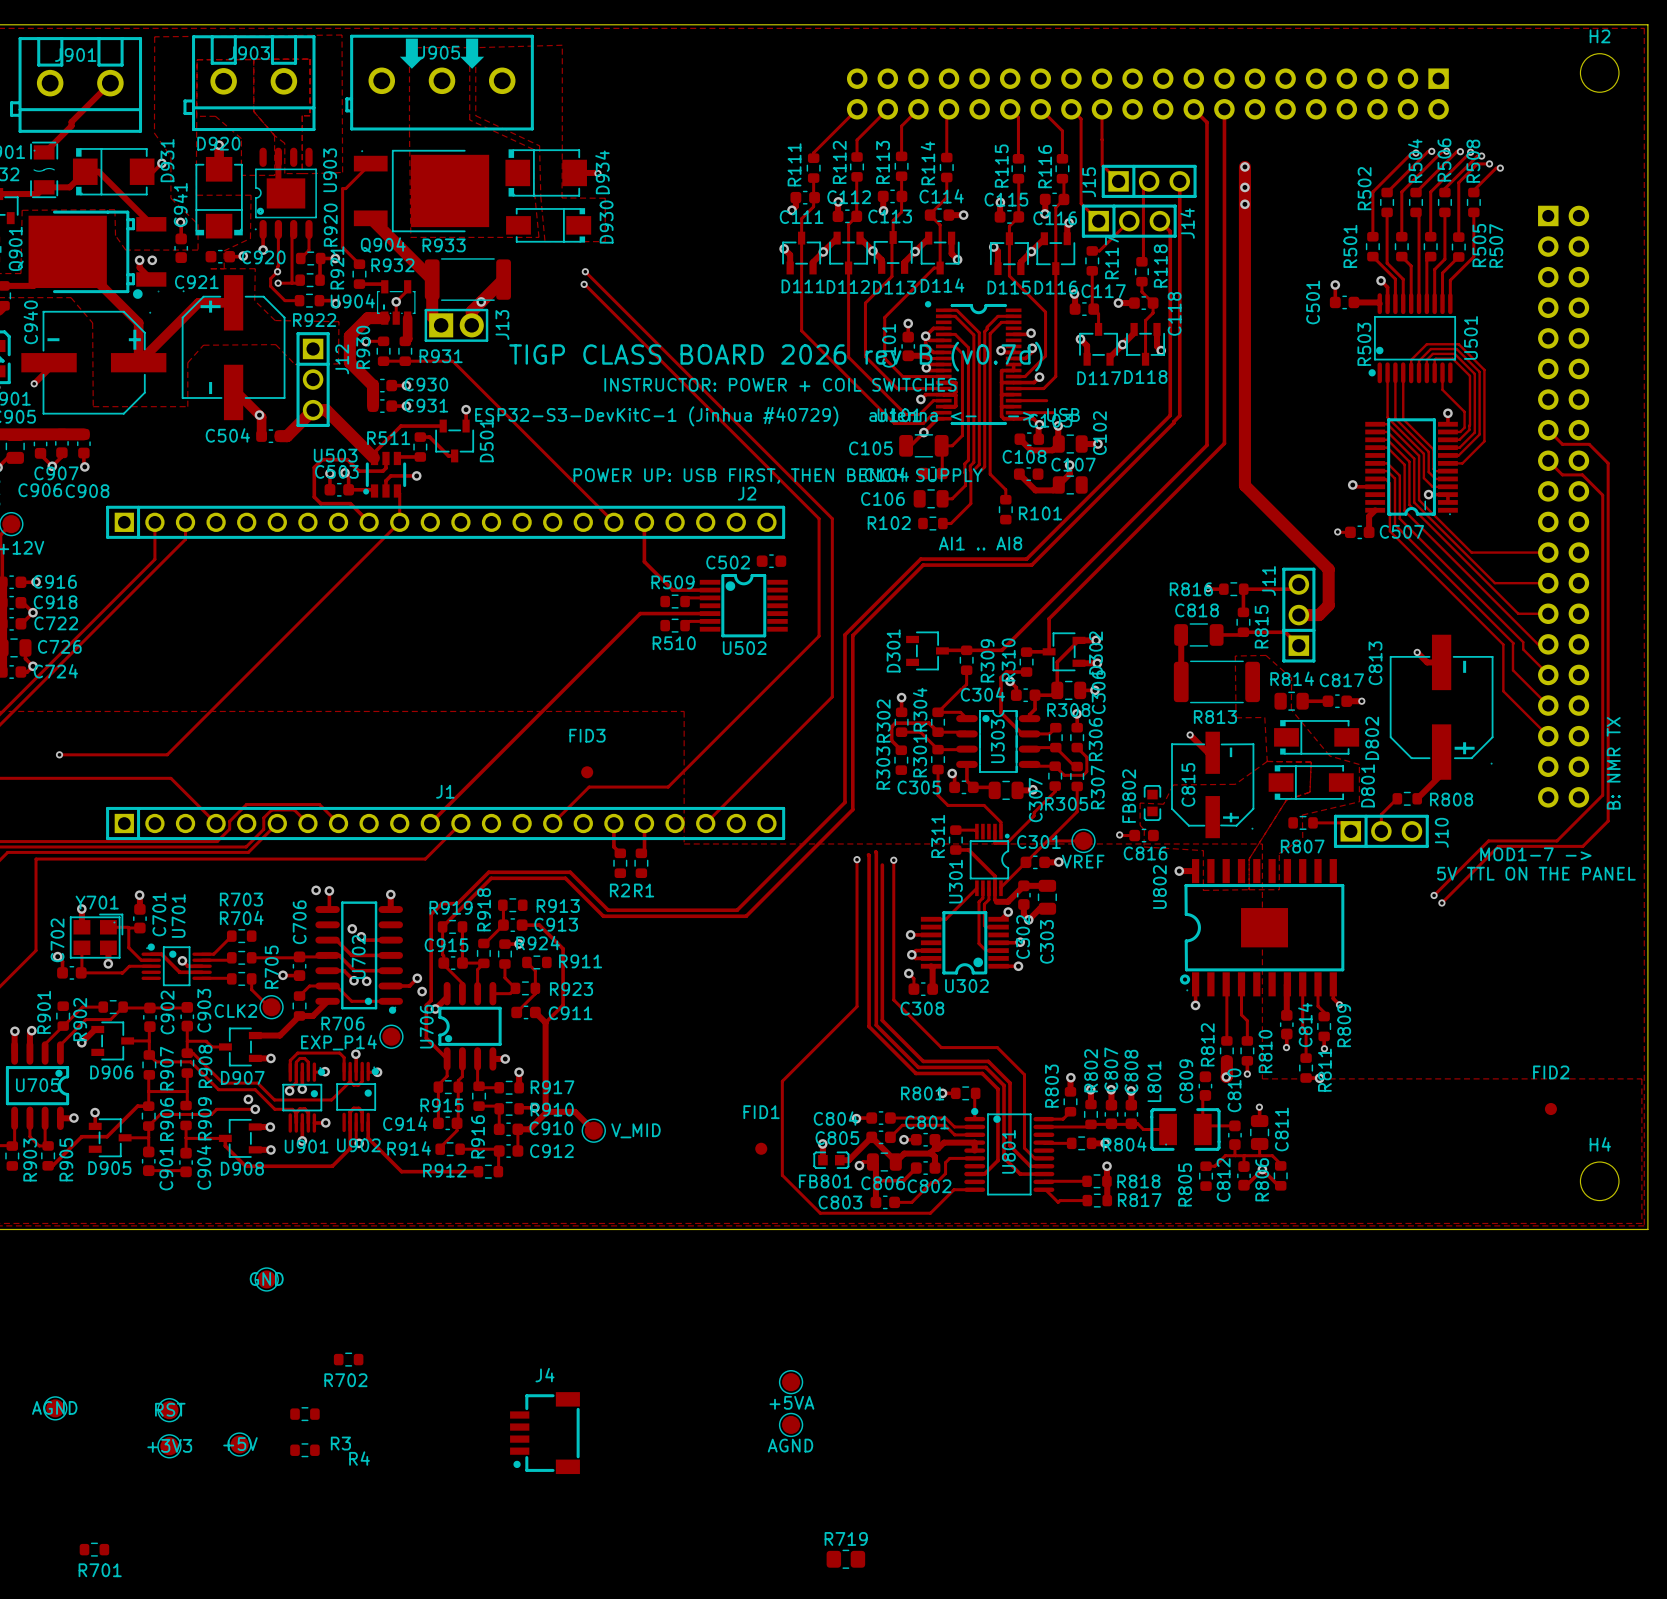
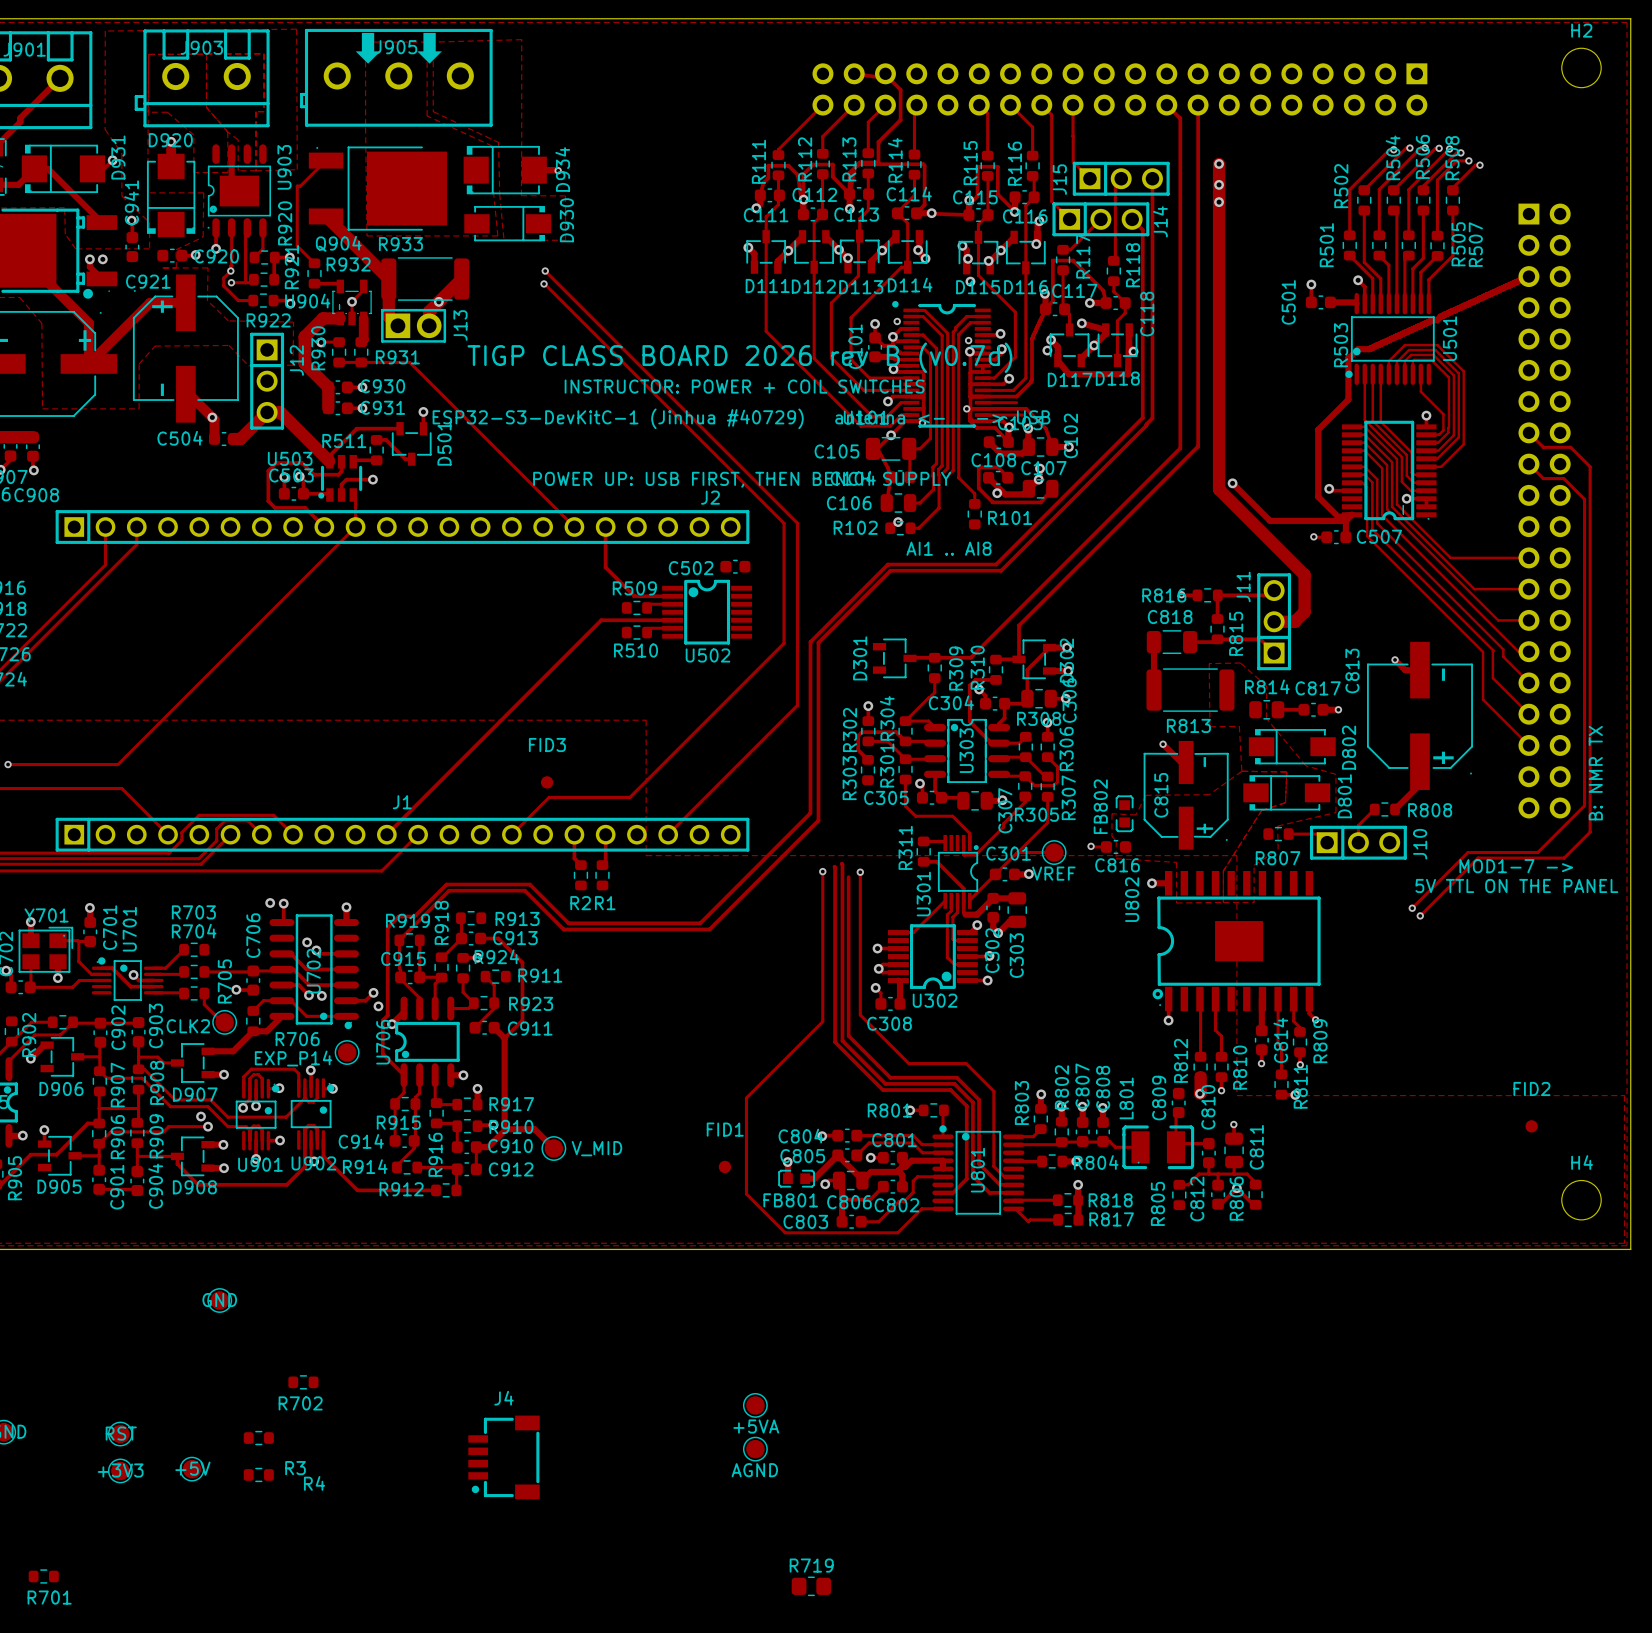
track: none -> (854, 73) (889, 78) (900, 89) (900, 119) (878, 142) (878, 162) (860, 162) (849, 172) (849, 208)
track: none -> (858, 164) (923, 164) (924, 204) (916, 213) (968, 215) (971, 202) (977, 196) (977, 166) (997, 166) (997, 194) (1015, 211)
track: none -> (855, 167) (849, 194) (832, 176) (832, 164) (813, 164) (803, 174) (803, 199)
track: none -> (760, 195) (763, 183) (768, 178) (768, 165) (788, 165) (797, 175) (803, 214)
via: none -> (1036, 244)
via: none -> (918, 250)
via: none -> (848, 258)
via: none -> (967, 258)
via: none -> (988, 260)
track: none -> (1528, 276) (1445, 314) (1437, 320) (1432, 320) (1371, 348) (1358, 349) (1348, 357) (1348, 399) (1318, 429) (1318, 496) (1338, 517) (1352, 514)
via: none -> (970, 281)
track: none -> (1106, 303) (1103, 290) (1073, 260) (1052, 260) (1052, 301) (1045, 309) (1031, 338) (1031, 381) (1016, 396) (982, 396)
via: none -> (897, 321)
track: none -> (1081, 323) (1105, 329)
via: none -> (1081, 323)
track: none -> (1129, 329) (1127, 374) (1068, 374) (1057, 360)
track: none -> (875, 337) (883, 345) (892, 345)
via: none -> (968, 340)
via: none -> (1047, 350)
track: none -> (971, 353) (970, 372)
track: none -> (911, 371) (923, 371) (923, 384)
track: none -> (923, 408) (922, 423)
via: none -> (966, 408)
track: none -> (970, 408) (970, 421) (976, 427) (995, 427) (1008, 442)
track: none -> (982, 408) (1026, 408) (1045, 428) (1052, 447)
via: none -> (922, 423)
track: none -> (877, 448) (890, 477) (886, 503)
track: none -> (1007, 477) (998, 467) (978, 467) (978, 488) (992, 502) (1040, 502) (1052, 488)
via: none -> (1038, 479)
track: none -> (1232, 483) (1270, 520) (1345, 520)
via: none -> (1232, 483)
via: none -> (997, 493)
via: none -> (898, 522)

